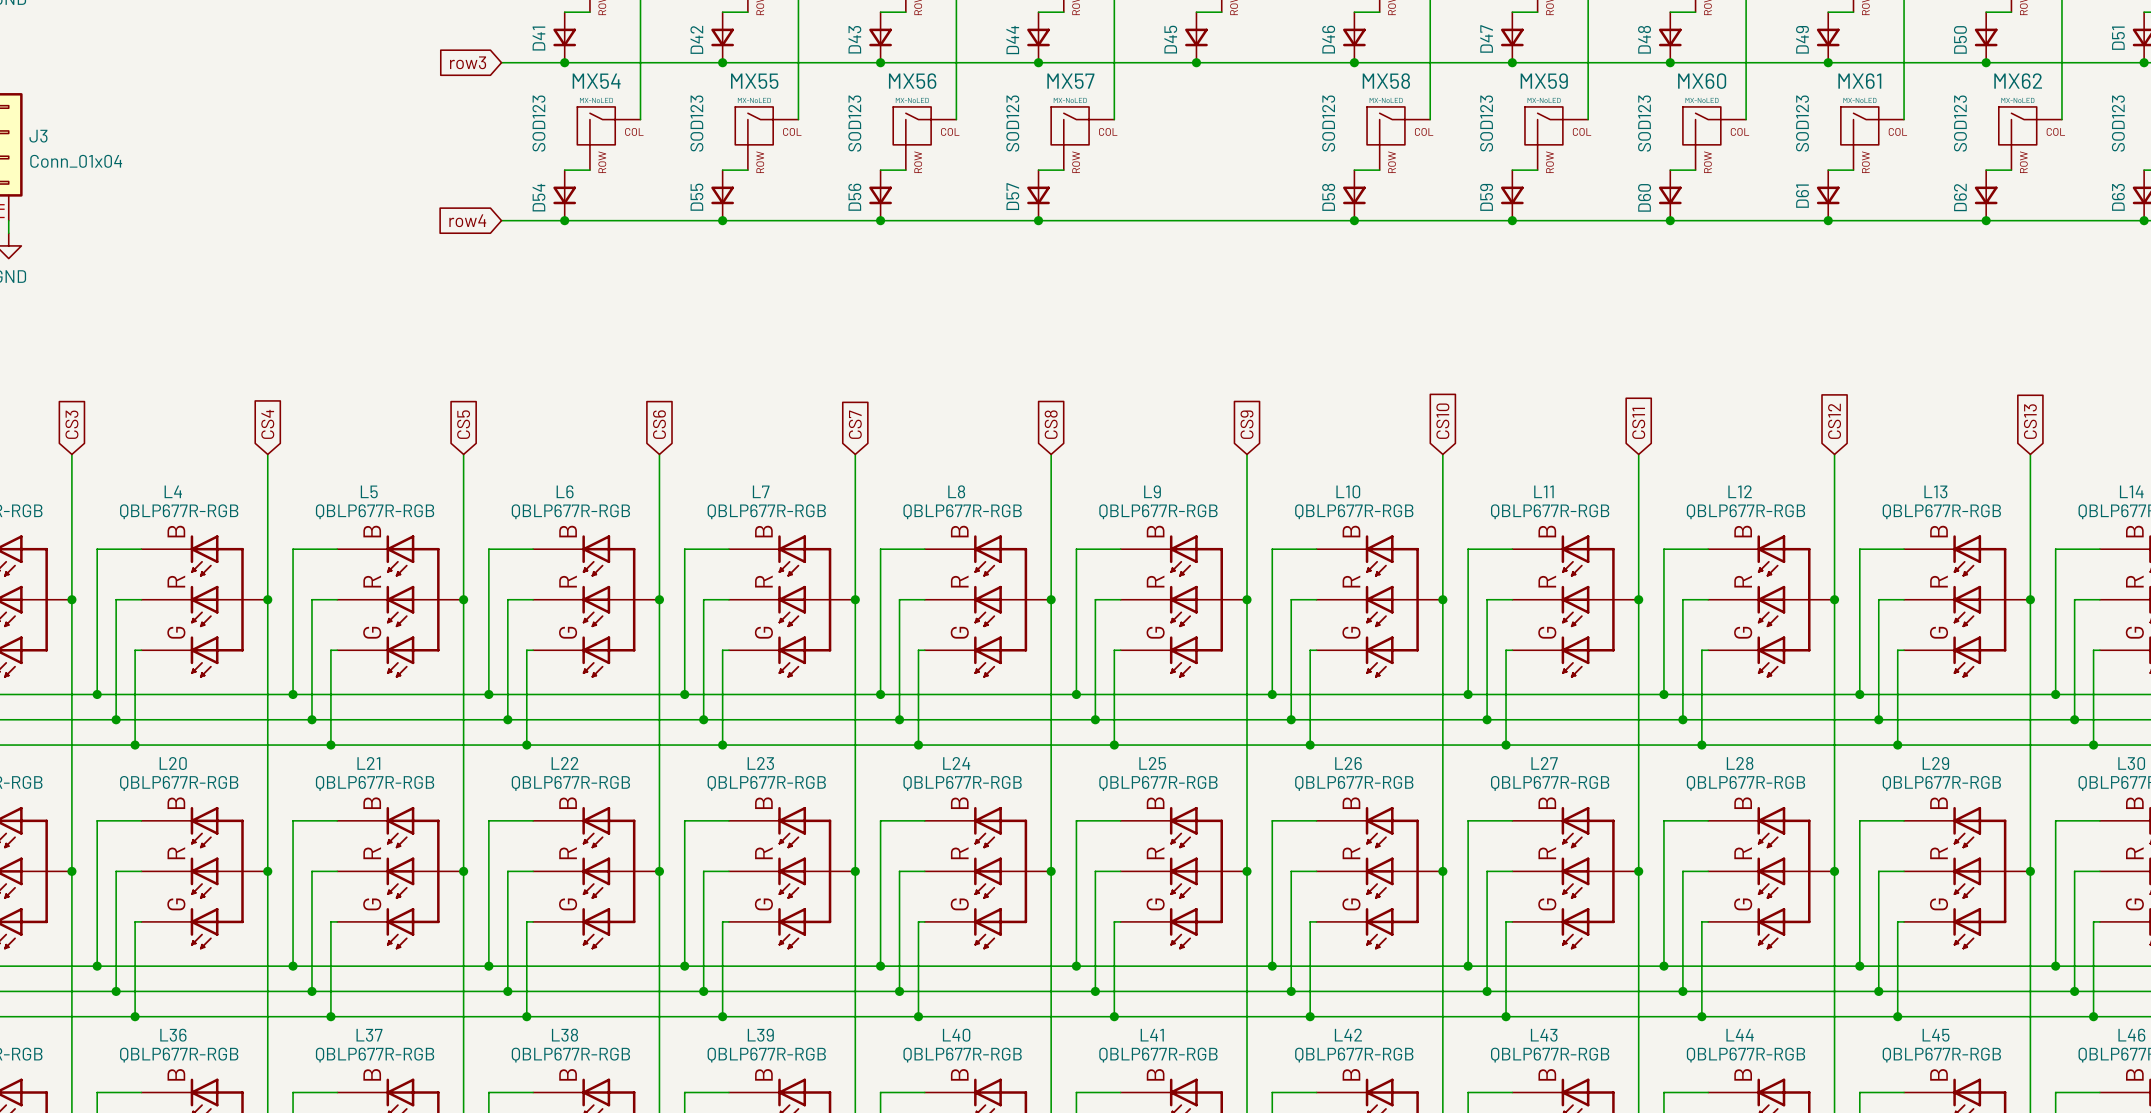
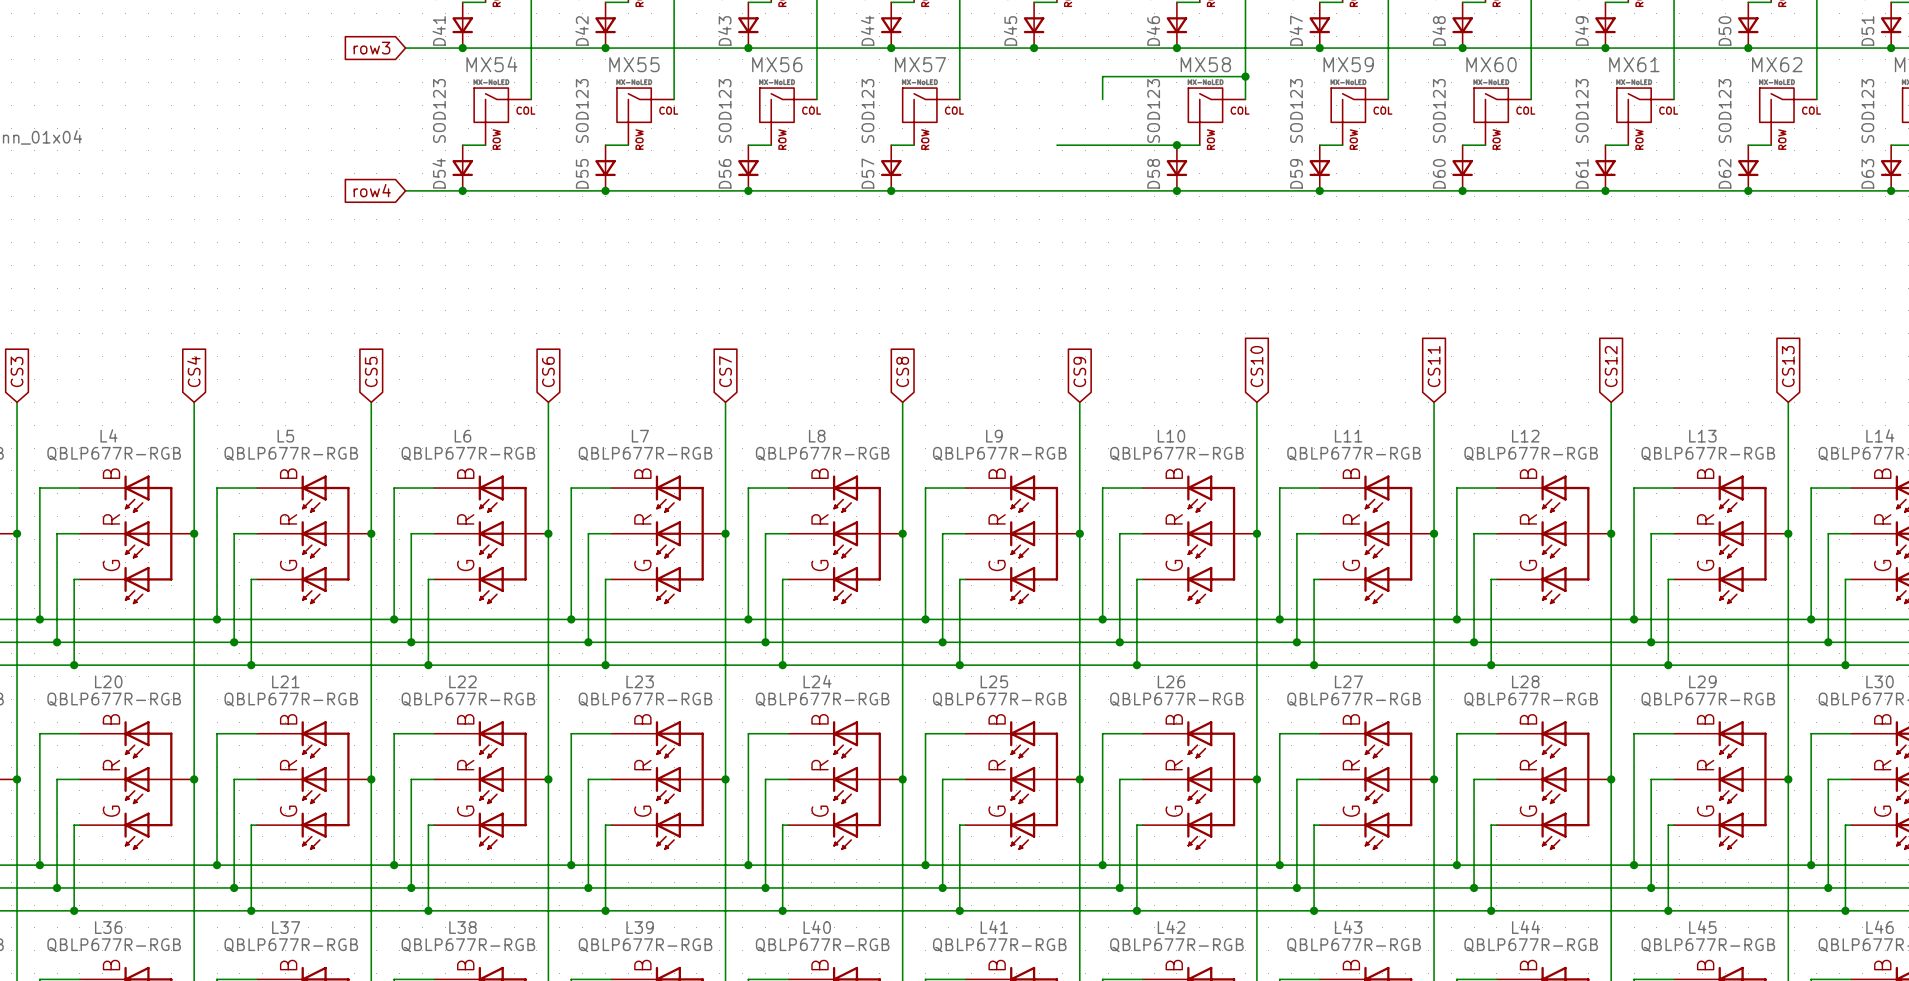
wire: none -> (1245, 76) (1102, 76) (1102, 99)
junction: none -> (1245, 76)
wire: none -> (1056, 145) (1176, 145)
junction: none -> (1176, 145)

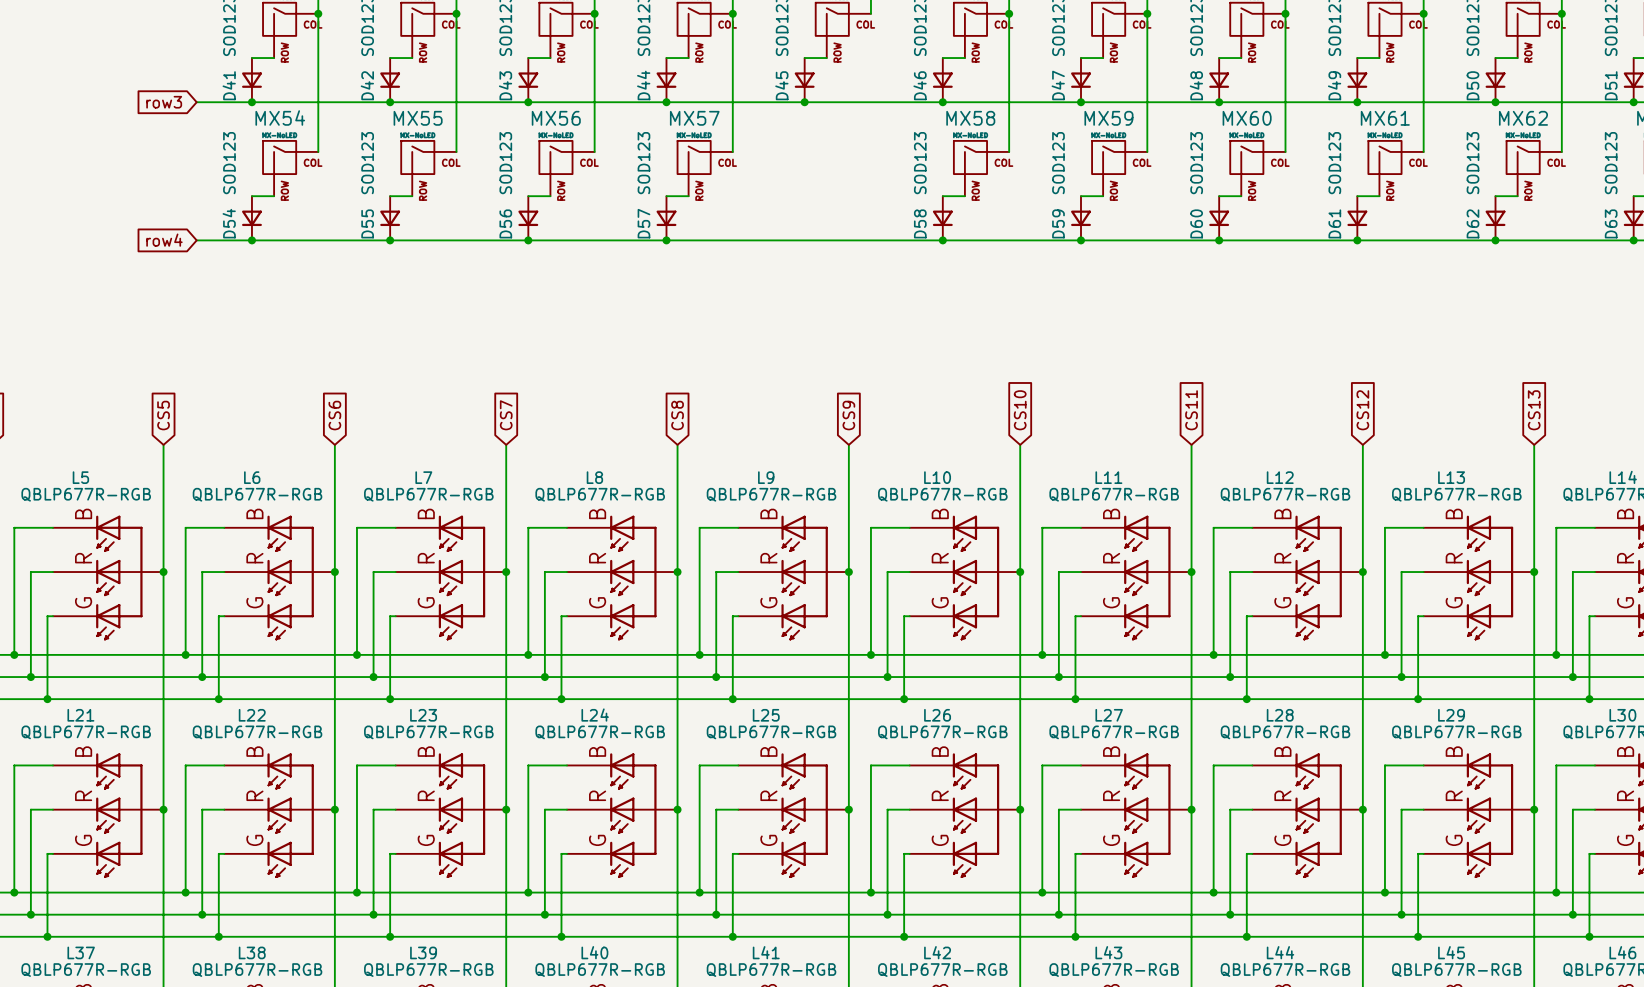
wire: (1245, 76) (1102, 76) (1102, 99) -> none
junction: (1245, 76) -> none
wire: (1056, 145) (1176, 145) -> none
junction: (1176, 145) -> none

